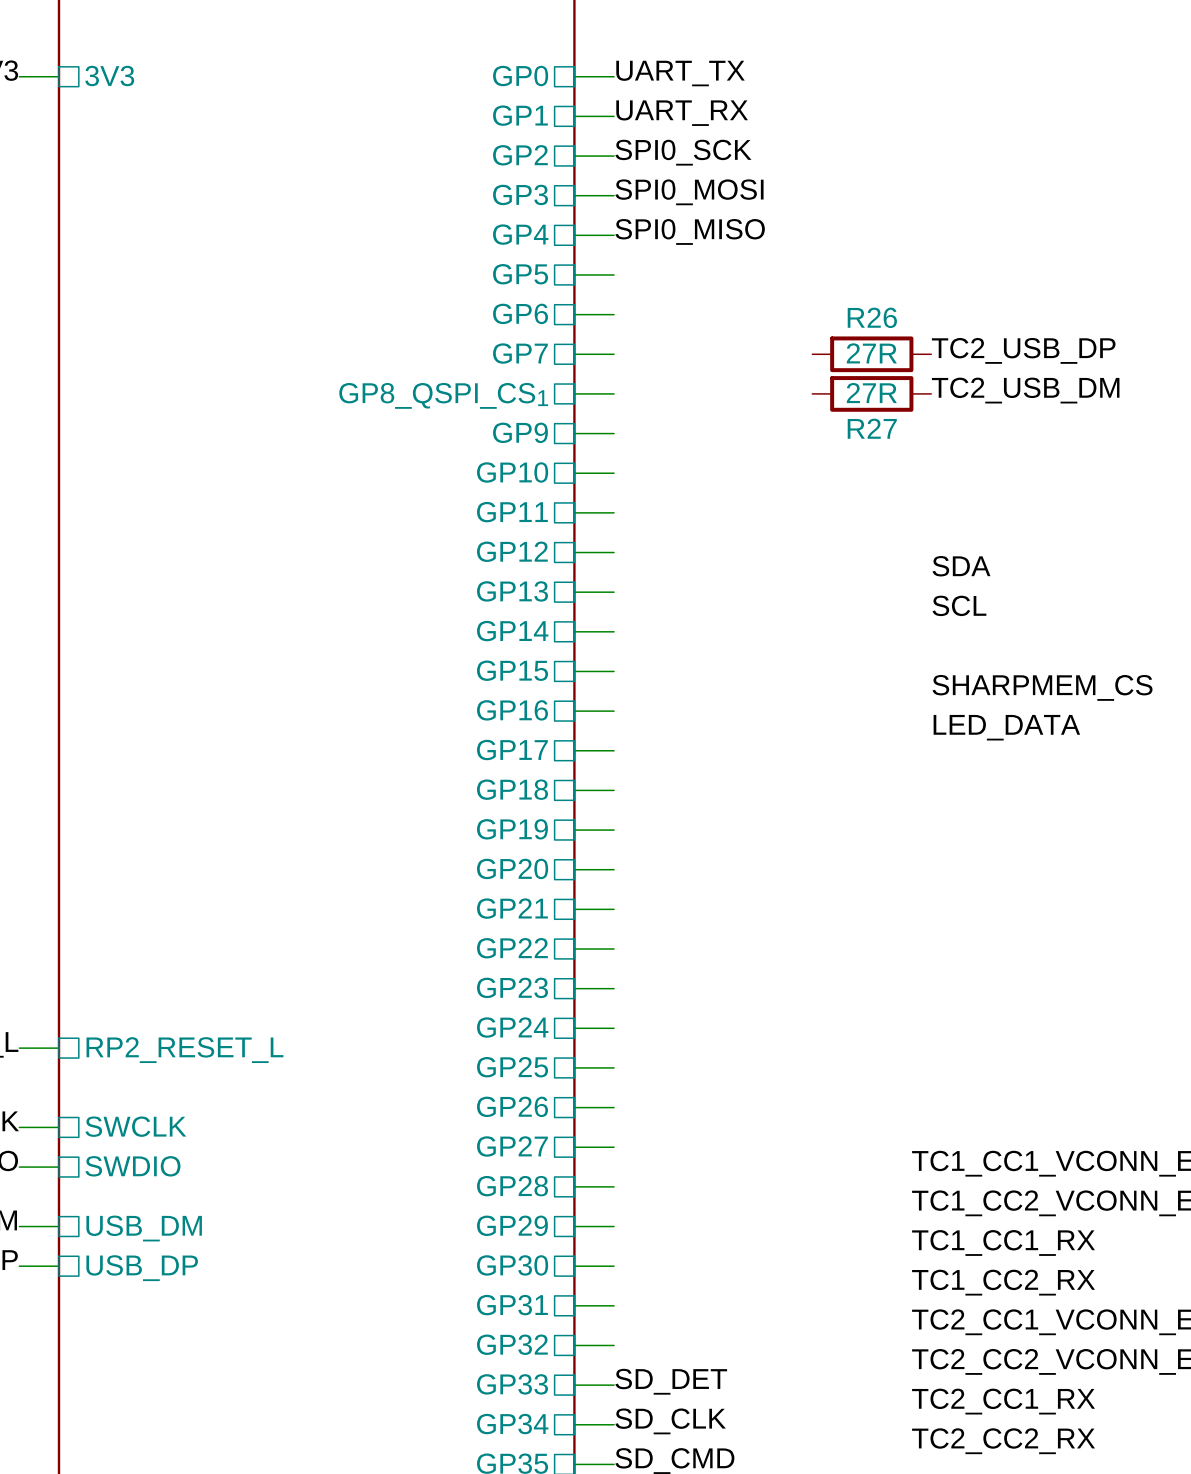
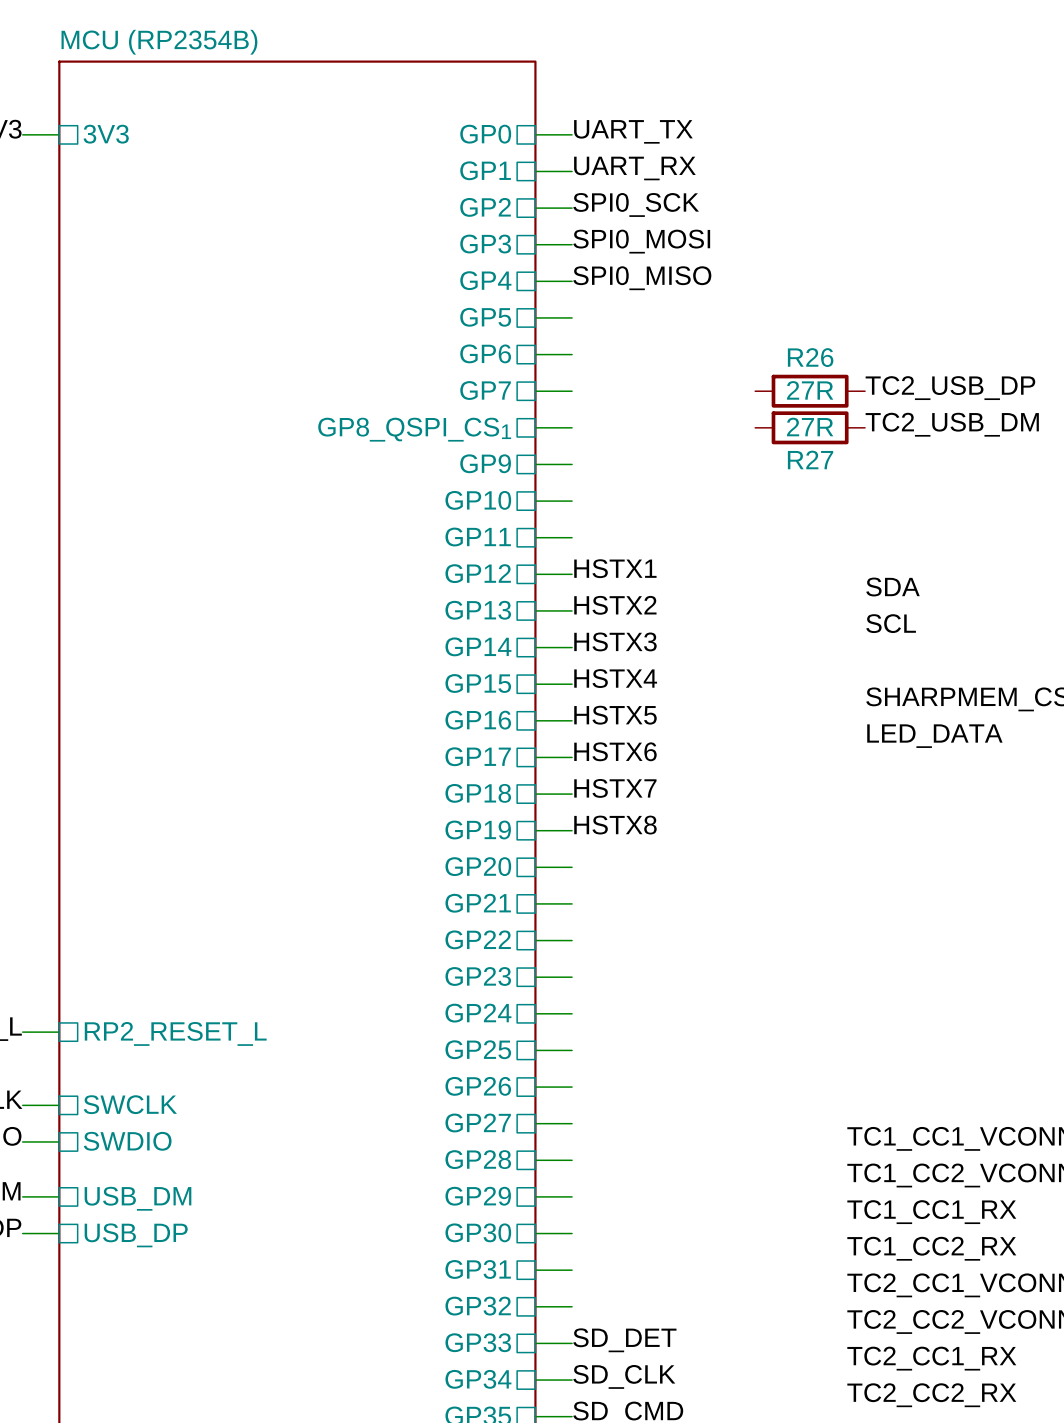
label: none -> HSTX1 (615, 568)
label: none -> HSTX2 (615, 605)
label: none -> HSTX3 (615, 641)
label: none -> HSTX4 (615, 678)
label: none -> HSTX5 (615, 715)
label: none -> HSTX6 (615, 751)
label: none -> HSTX7 (615, 788)
label: none -> HSTX8 (615, 825)

